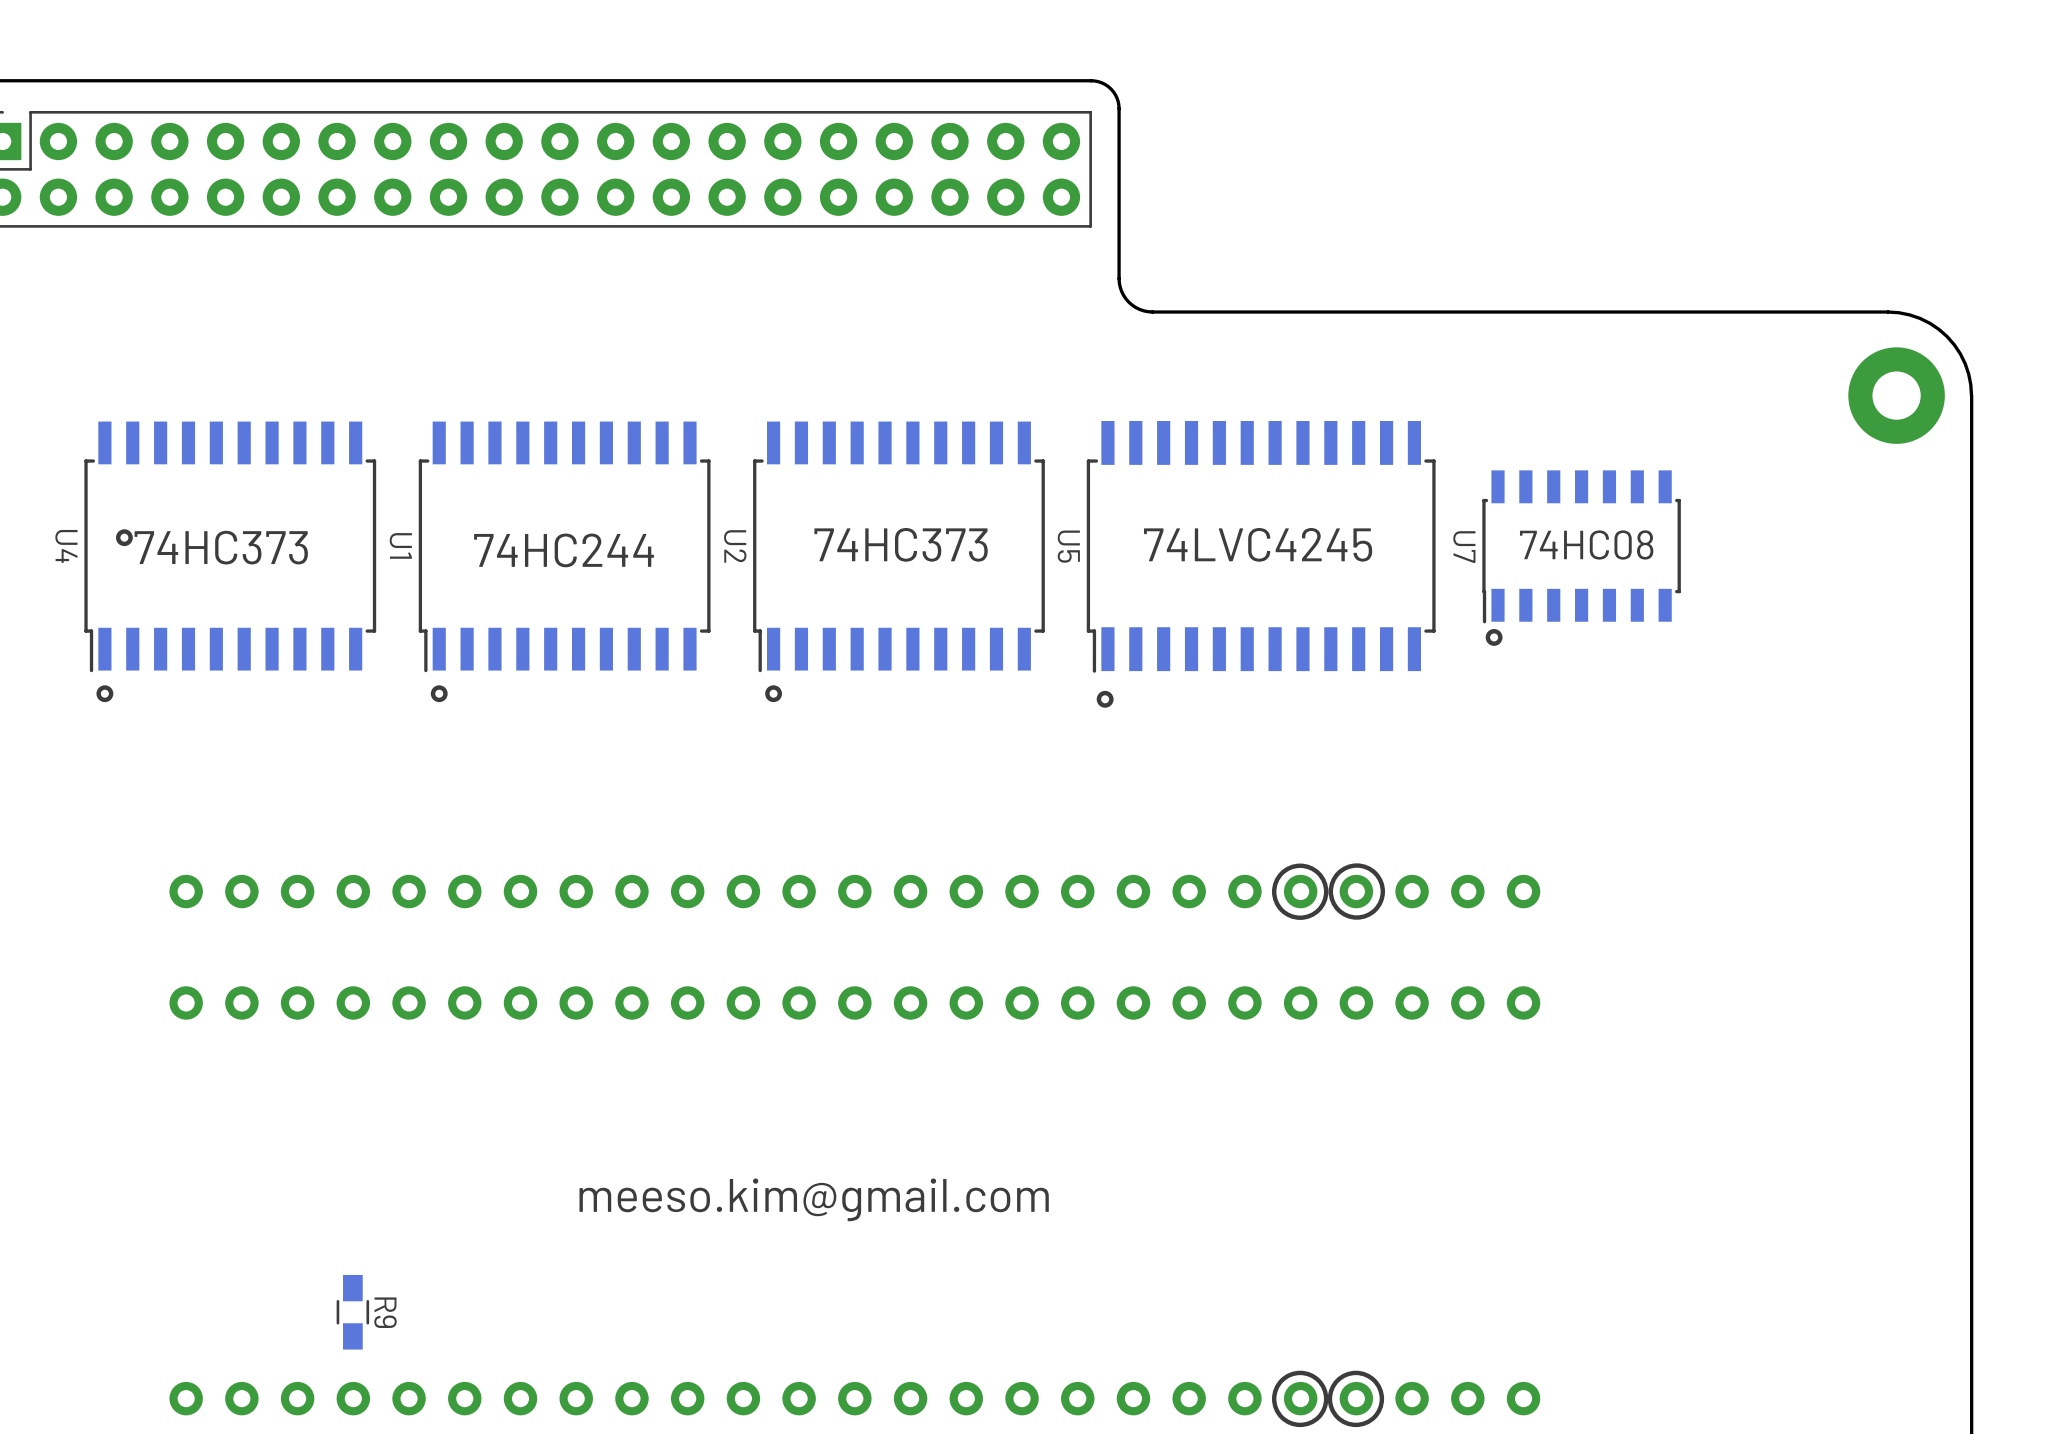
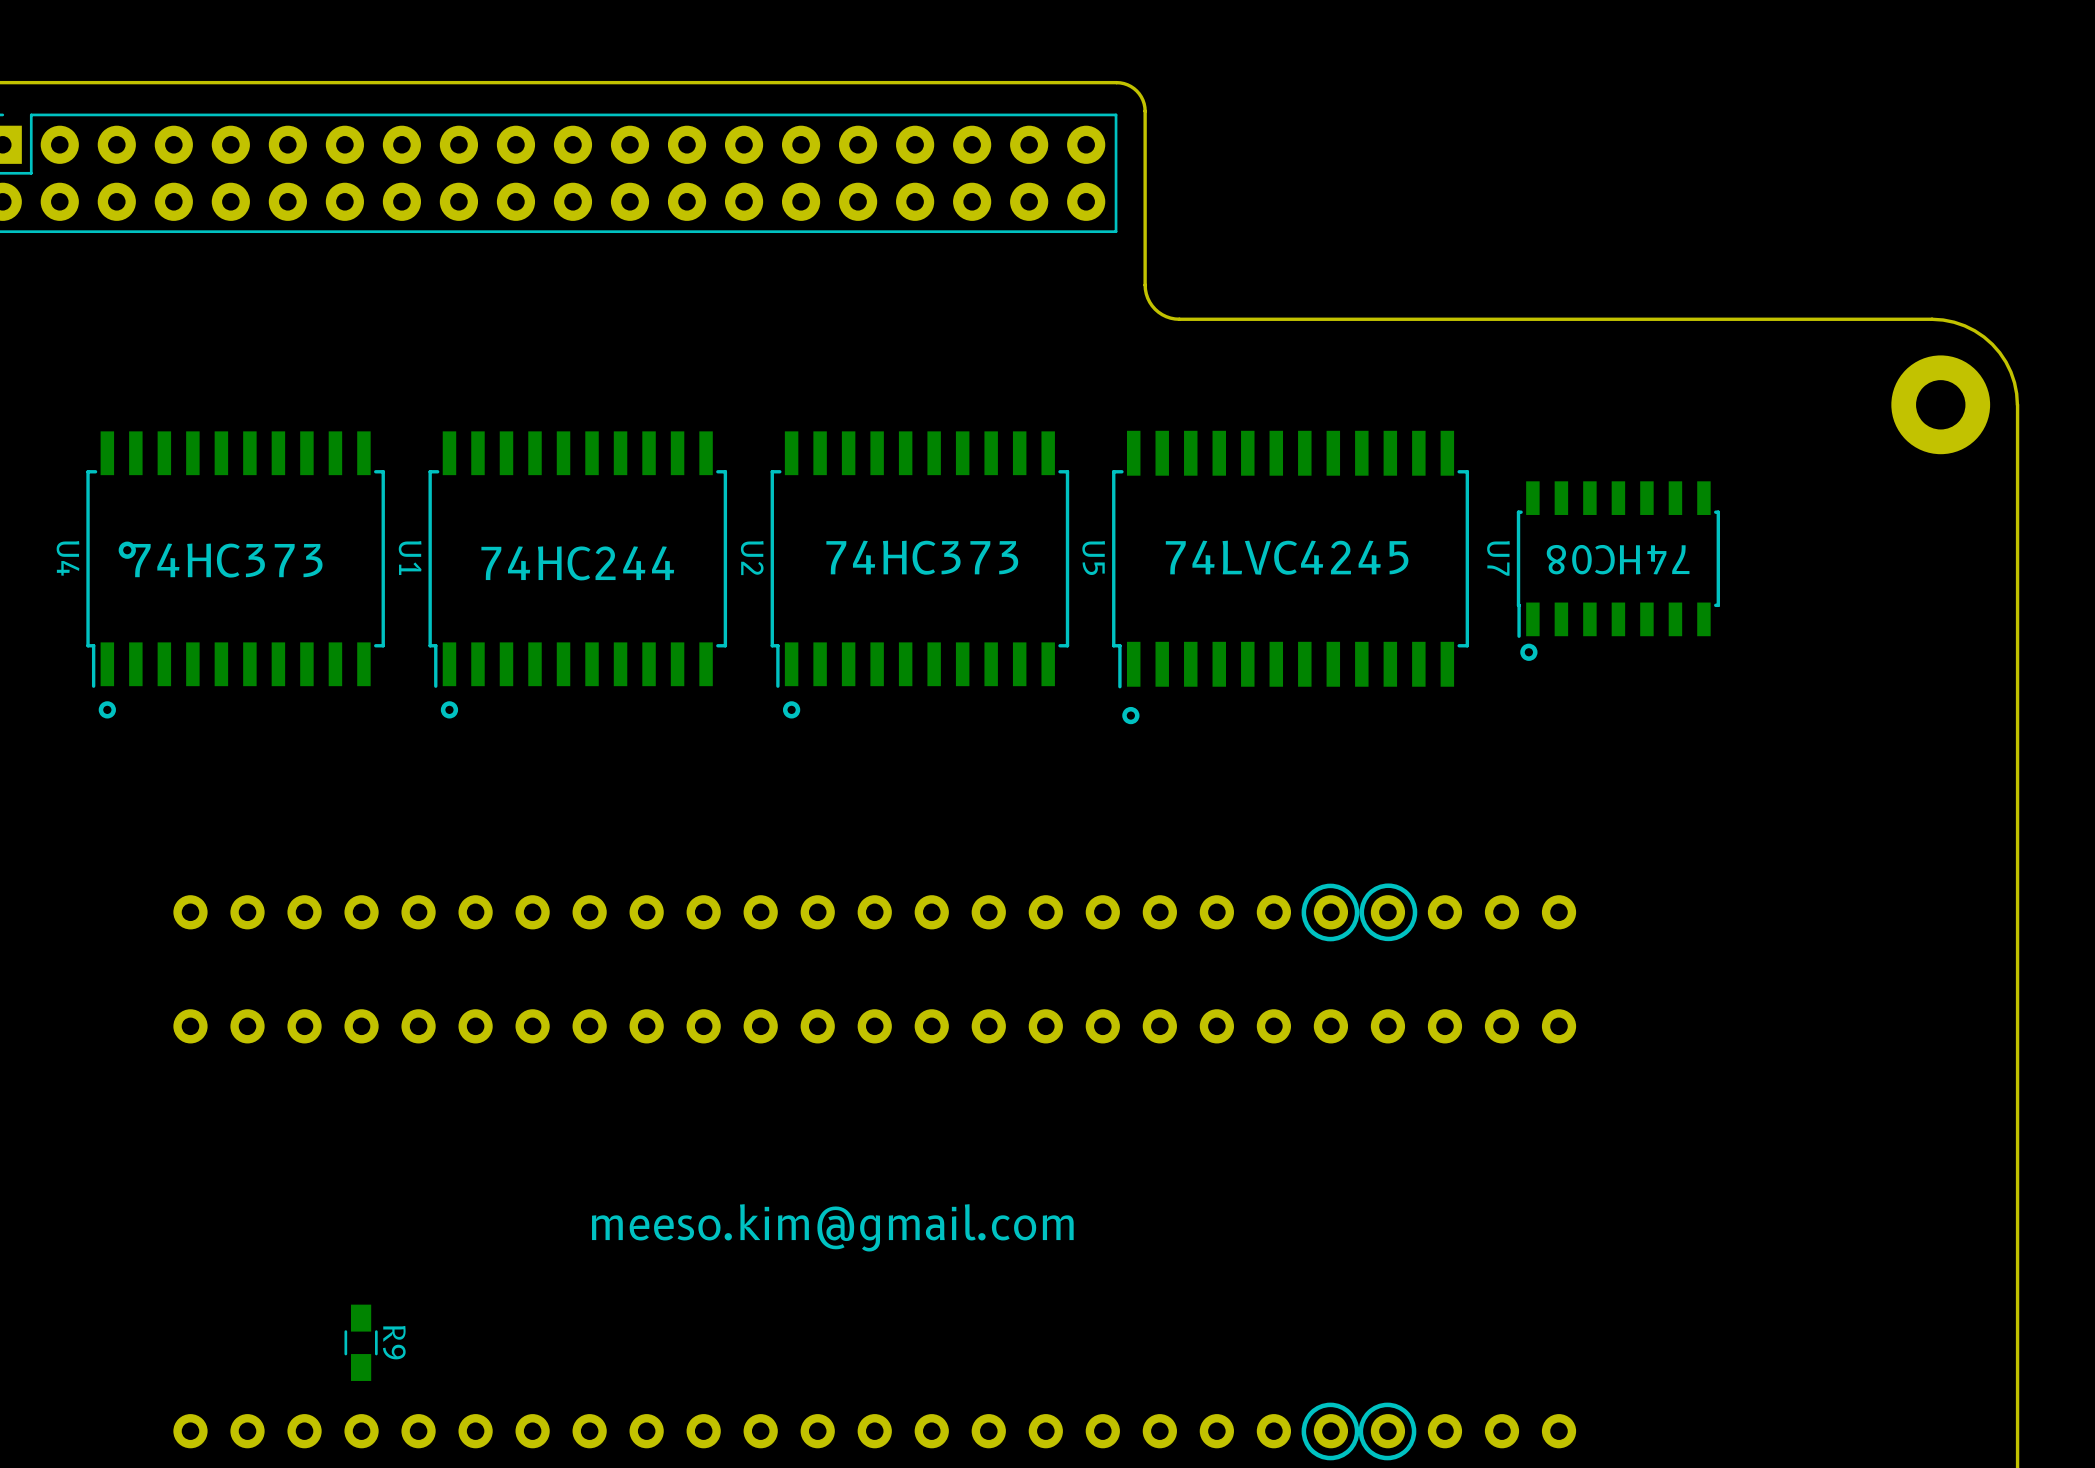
text rotation: 0° (1586, 544) -> 180° (1618, 559)

